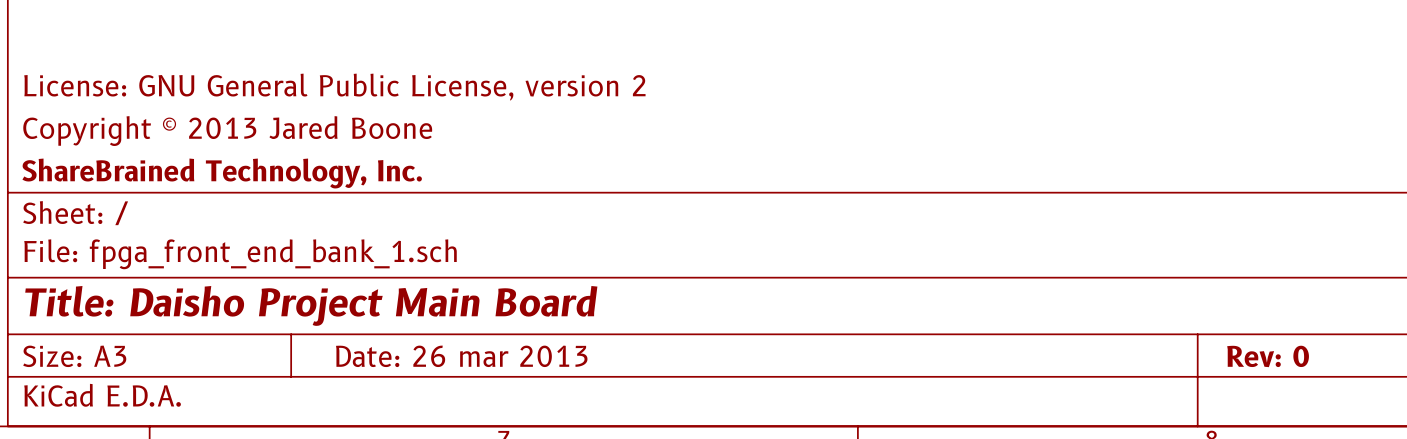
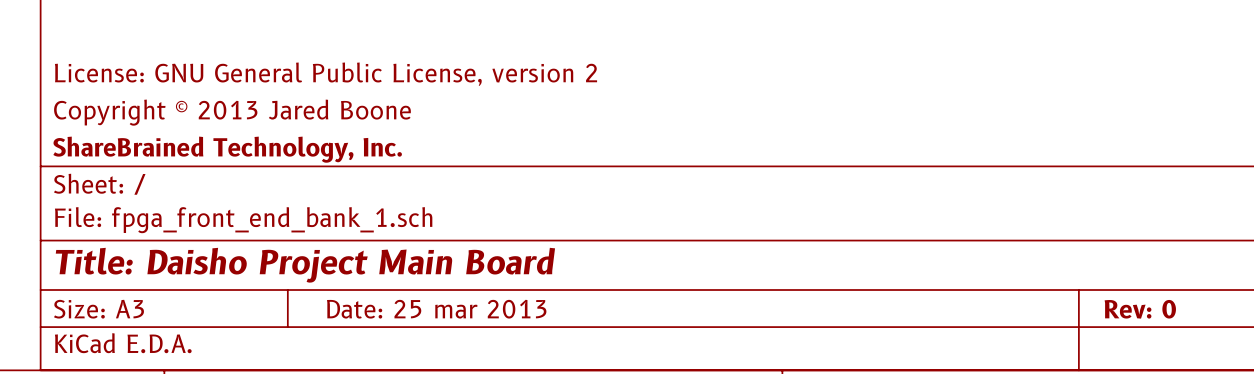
title block: Date: 26 mar 2013 (461, 356) -> Date: 25 mar 2013 (436, 309)

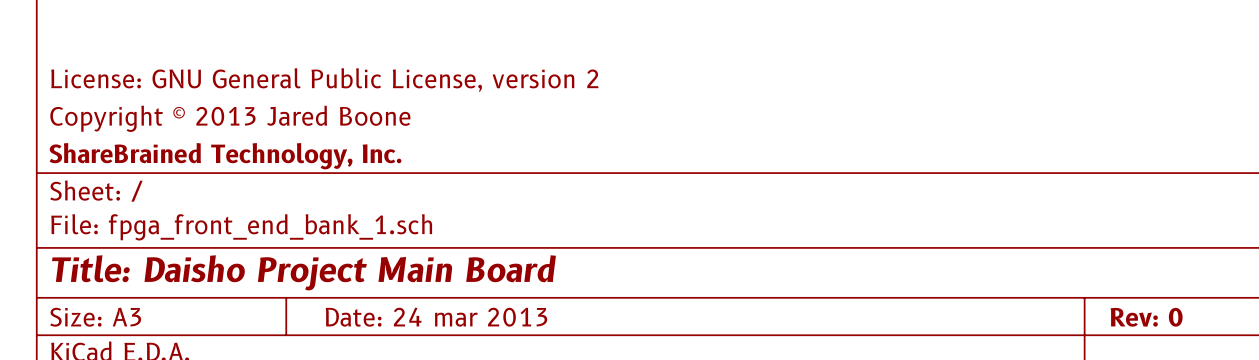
title block: Date: 25 mar 2013 (436, 309) -> Date: 24 mar 2013 (436, 317)

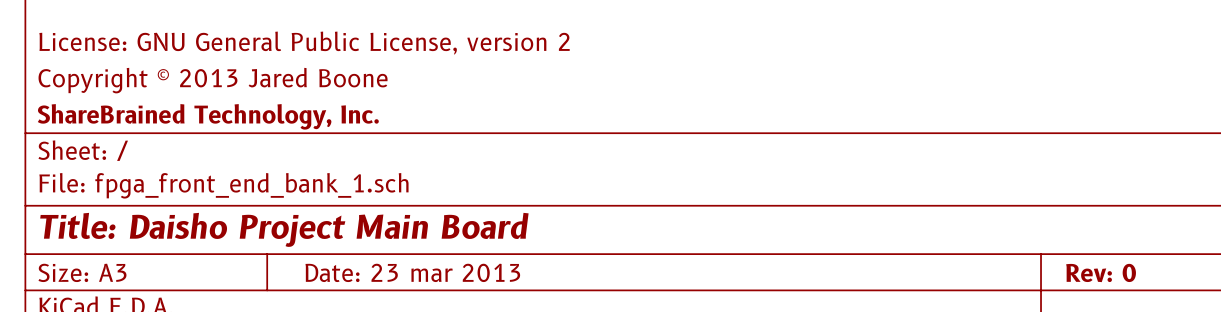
title block: Date: 24 mar 2013 (436, 317) -> Date: 23 mar 2013 (412, 272)

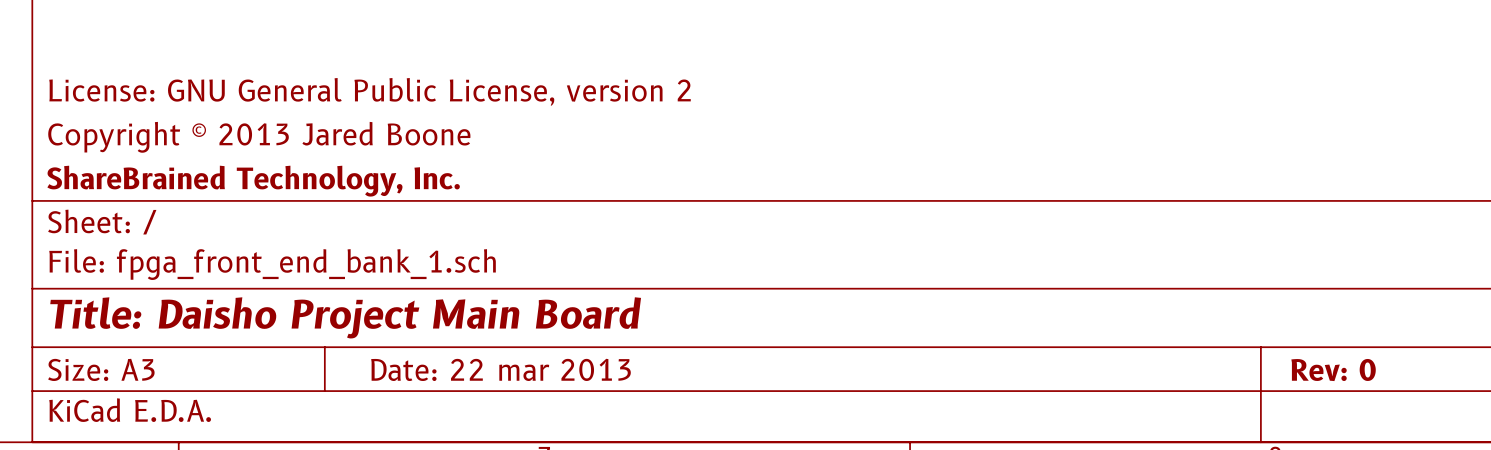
title block: Date: 23 mar 2013 (412, 272) -> Date: 22 mar 2013 (500, 369)

